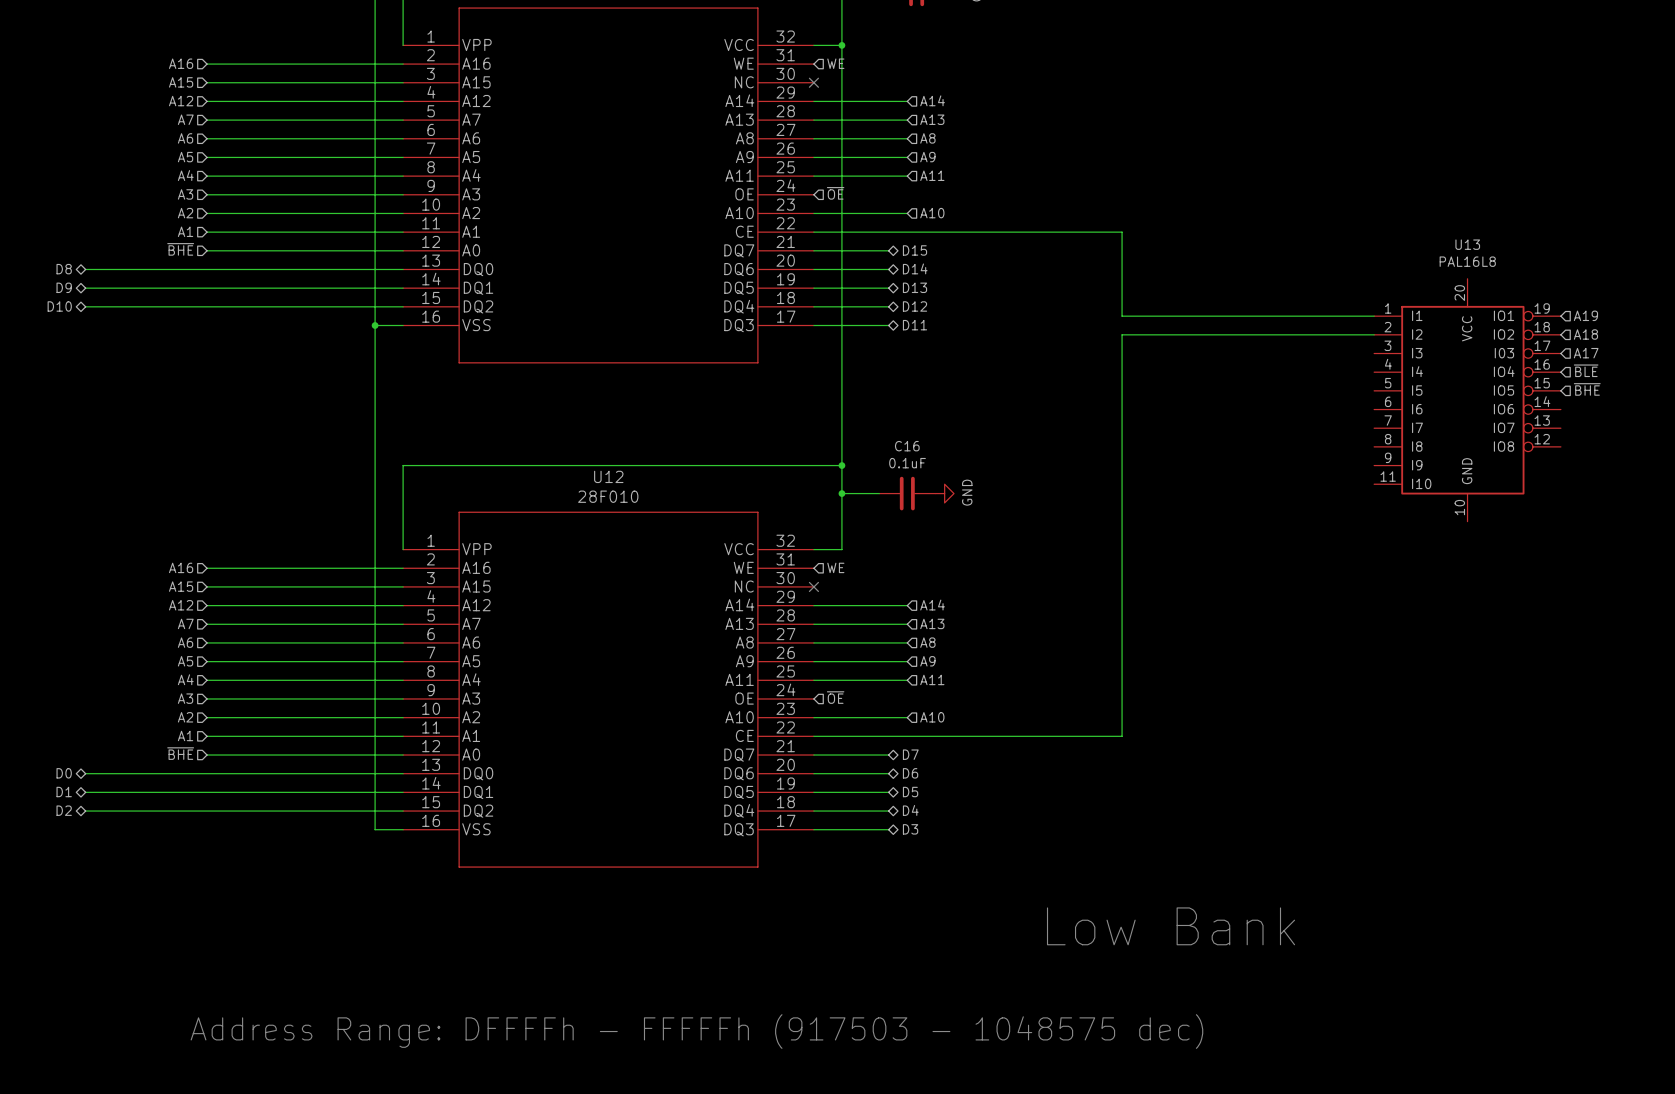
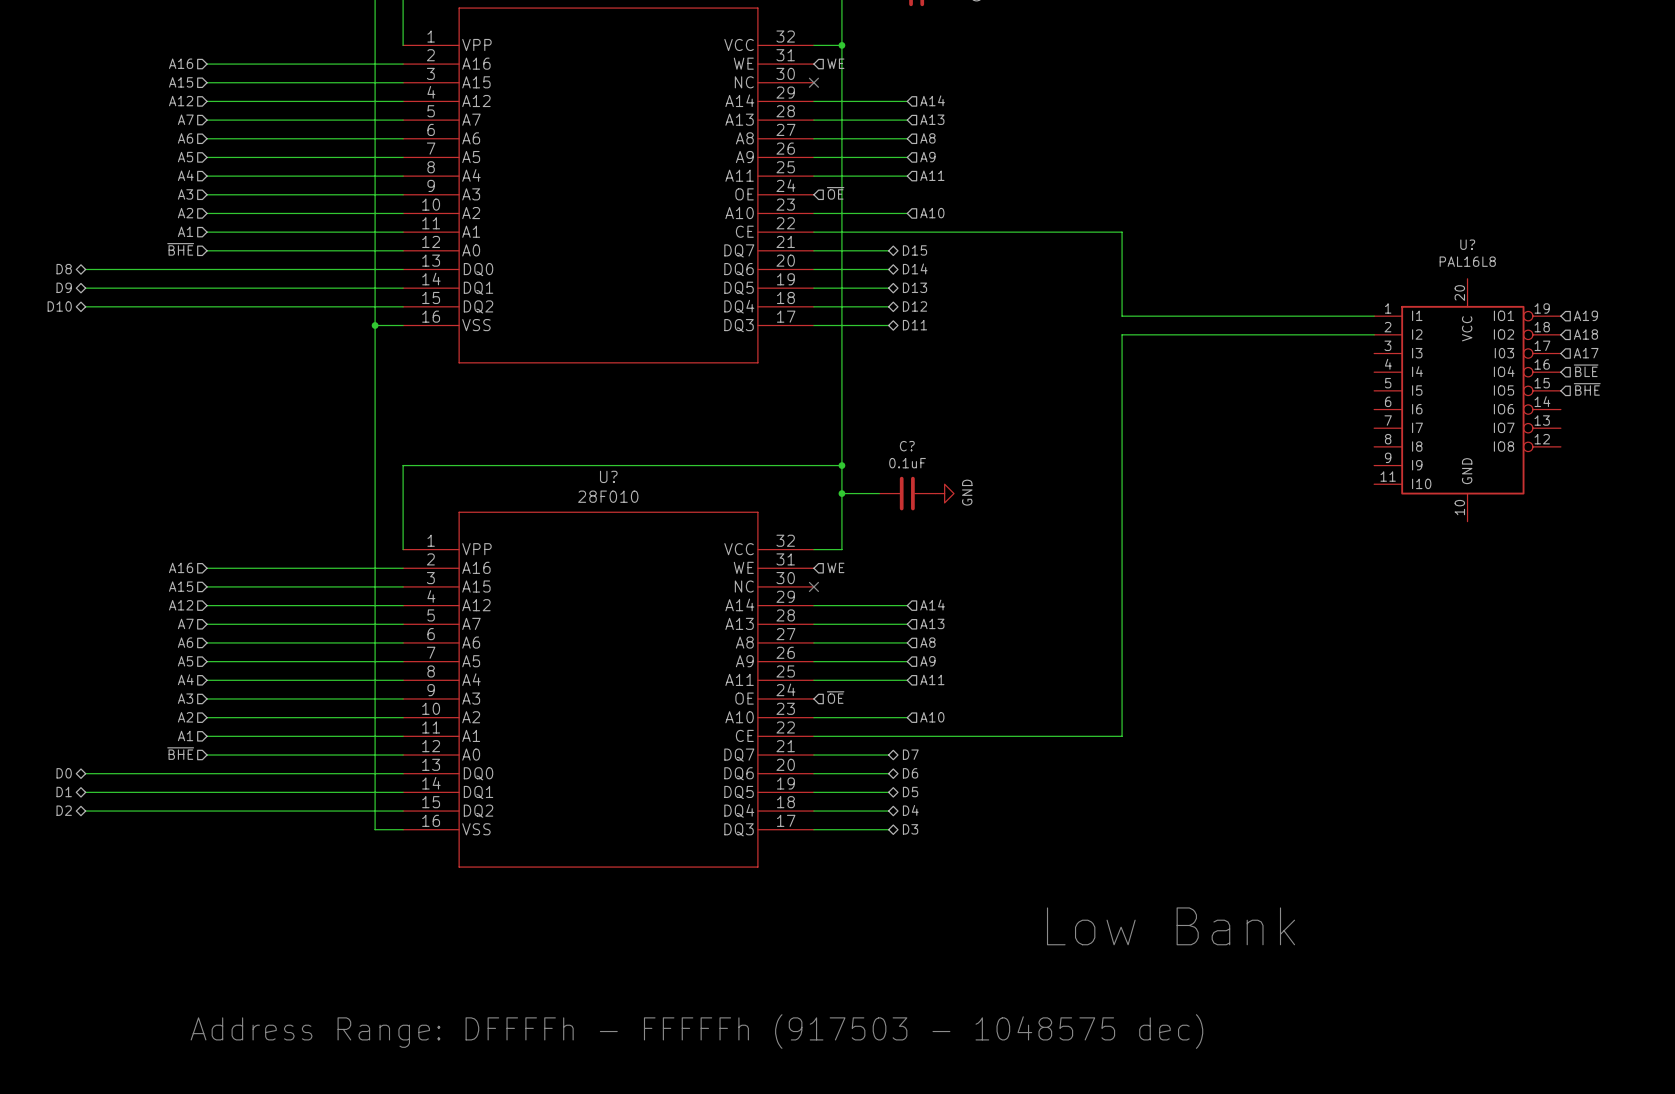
U13 name: U13 (1467, 244) -> U? (1467, 244)
C16 name: C16 (907, 446) -> C? (907, 446)
U12 name: U12 (608, 476) -> U? (608, 476)

